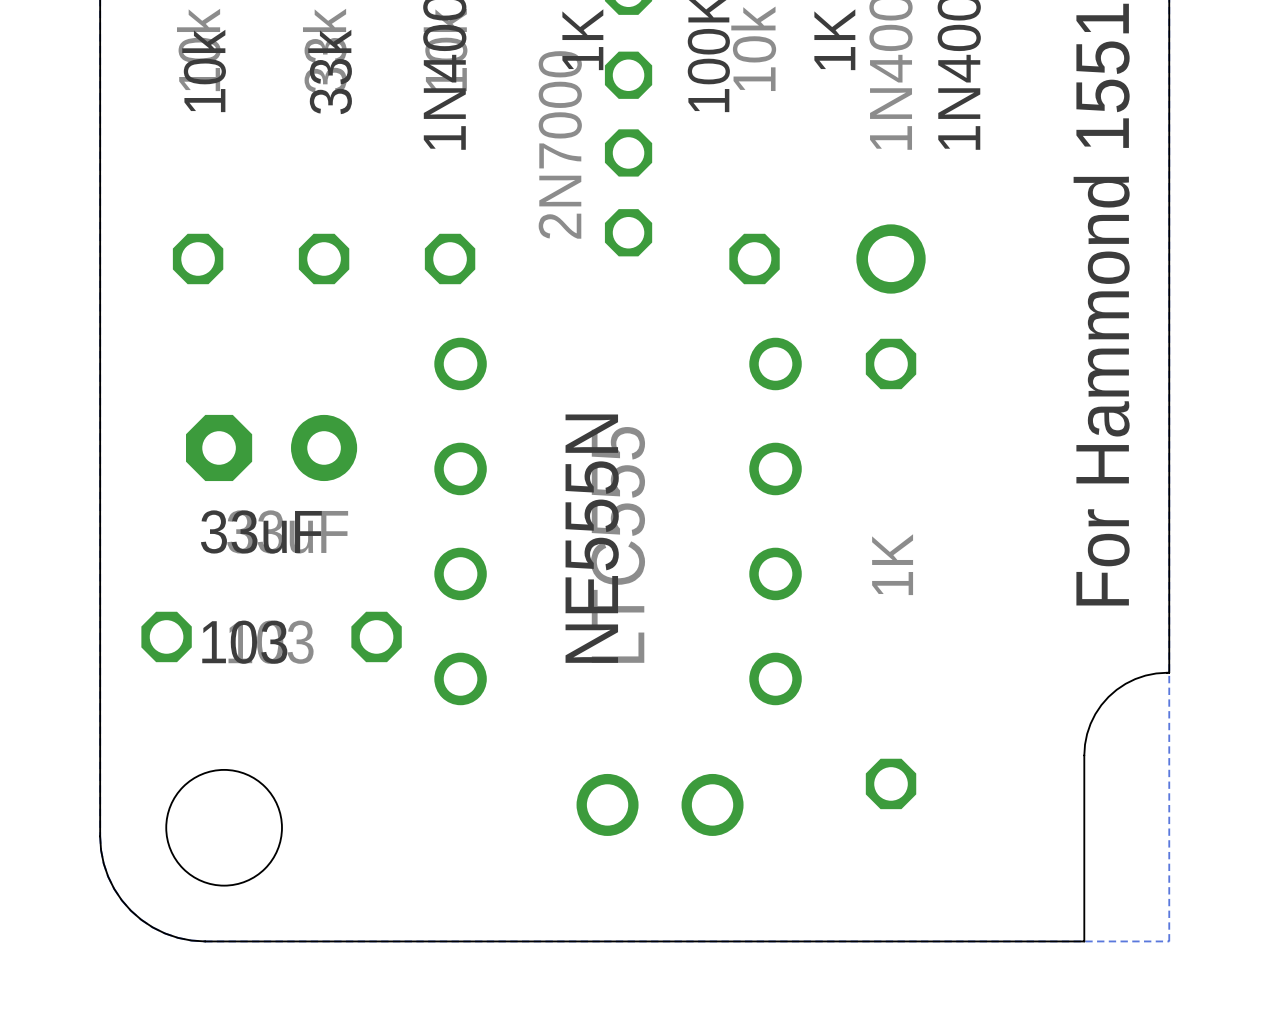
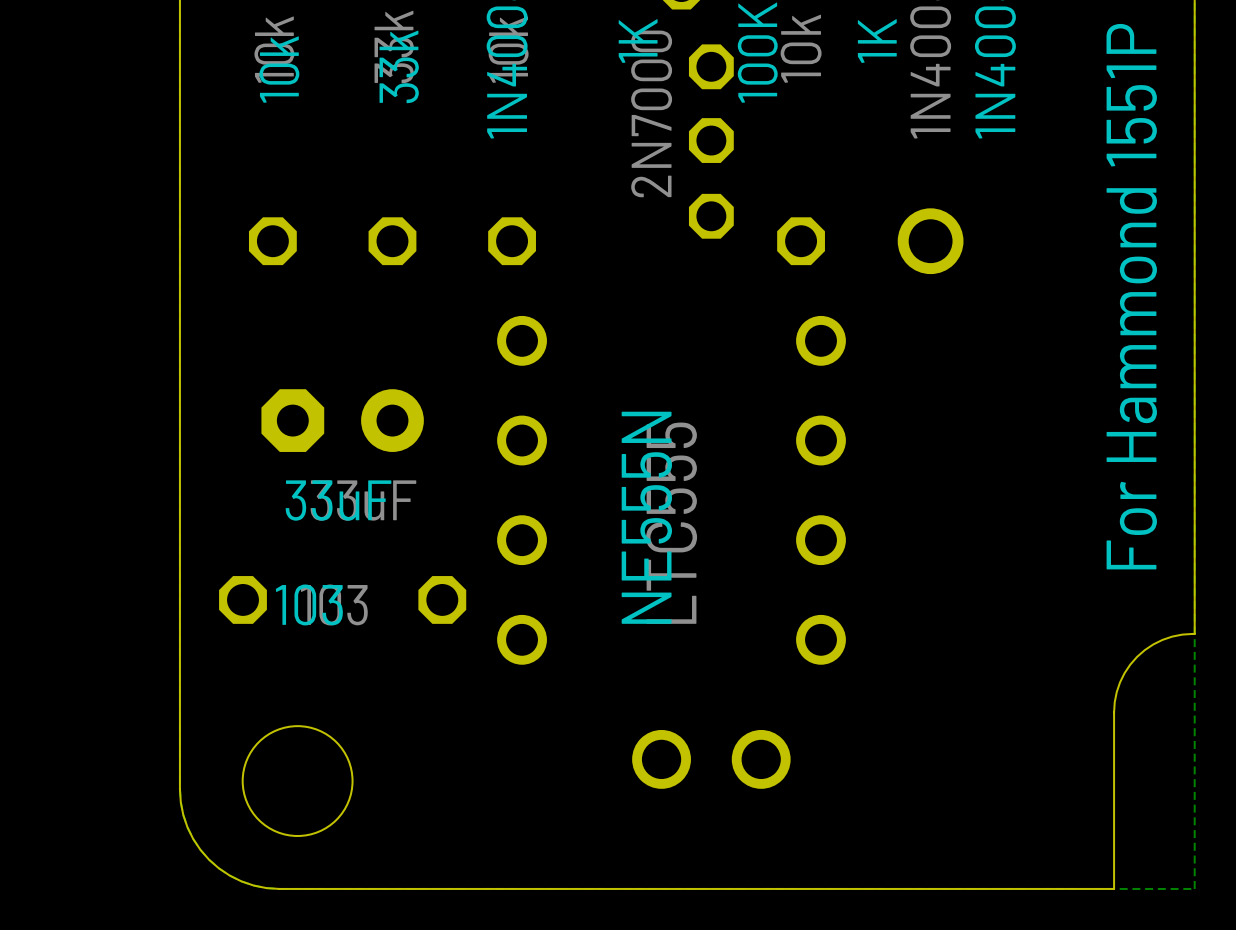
part value position: 2N7000 (560, 144) -> 2N7000 (651, 113)
part position: (628, 154) -> (711, 141)
part: 1K (891, 573) -> none

